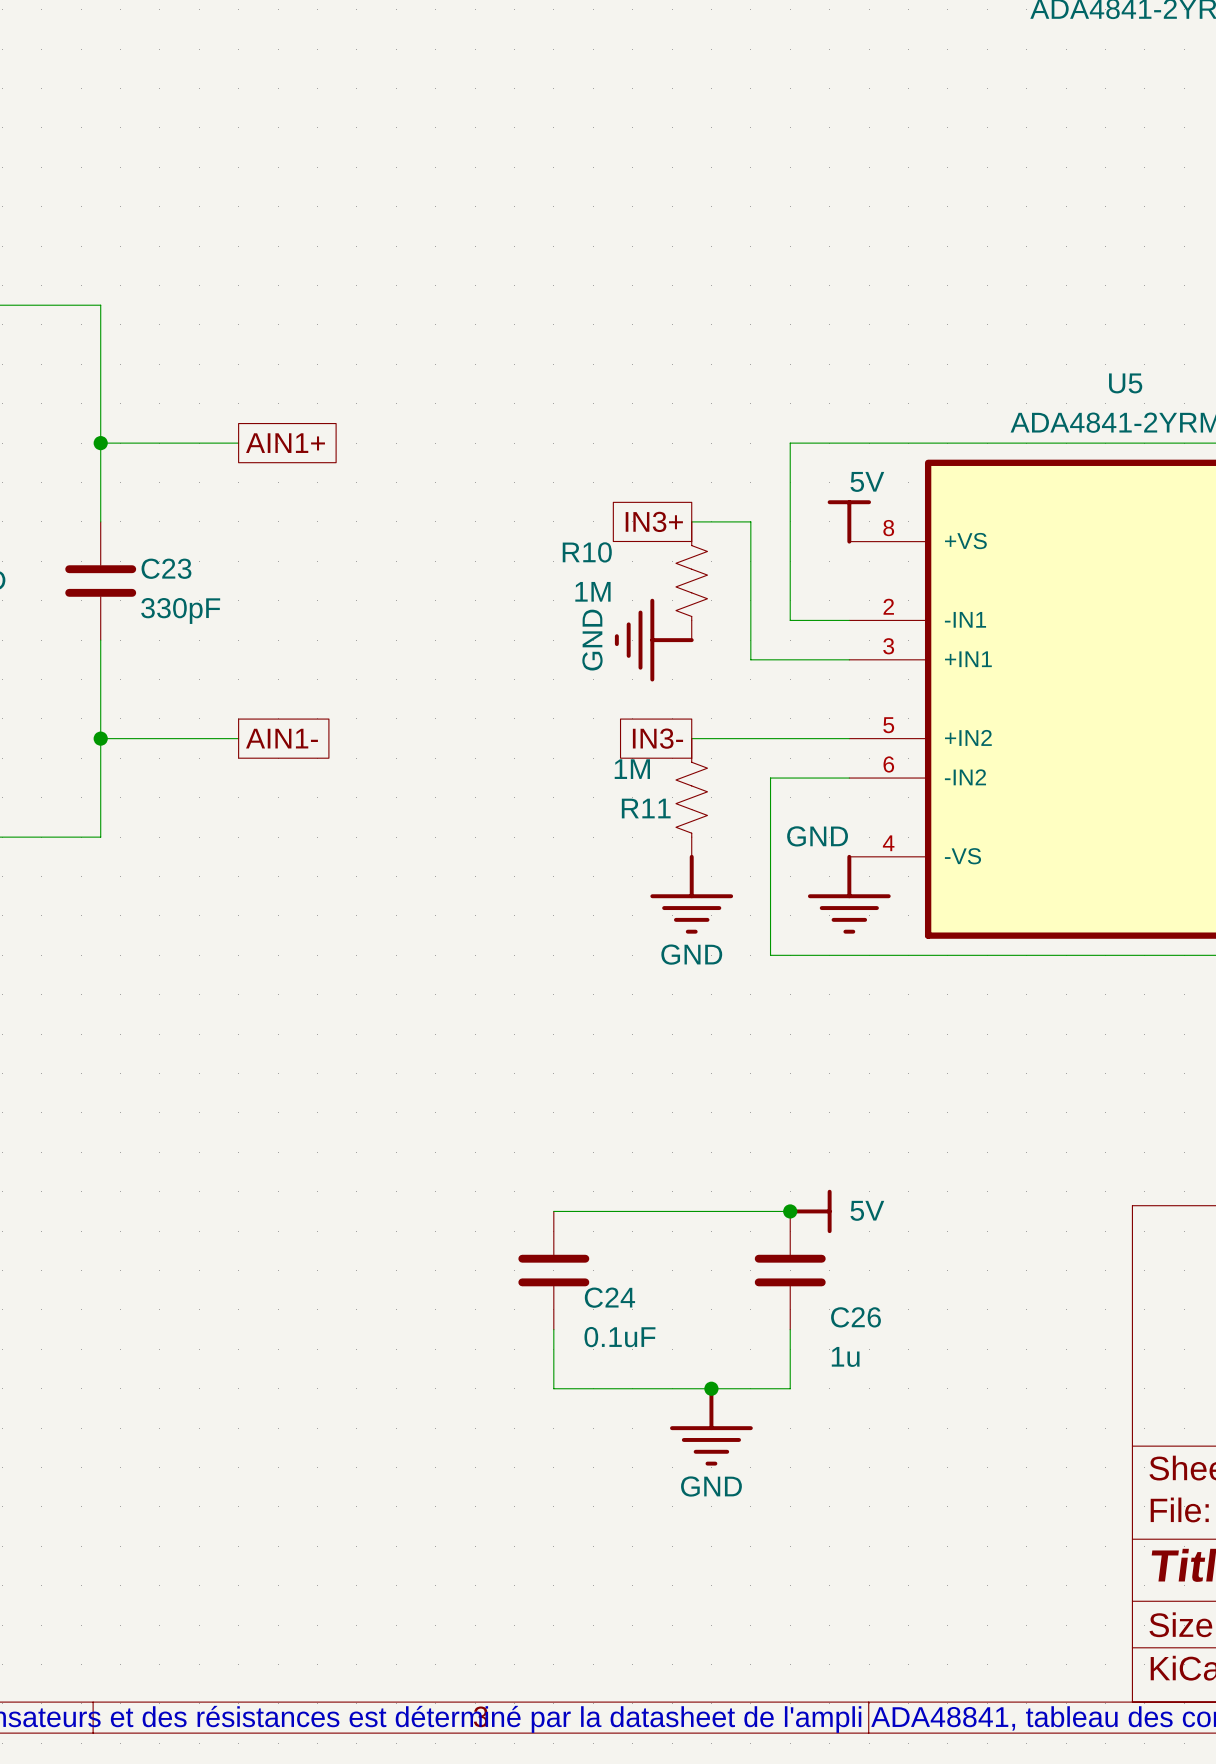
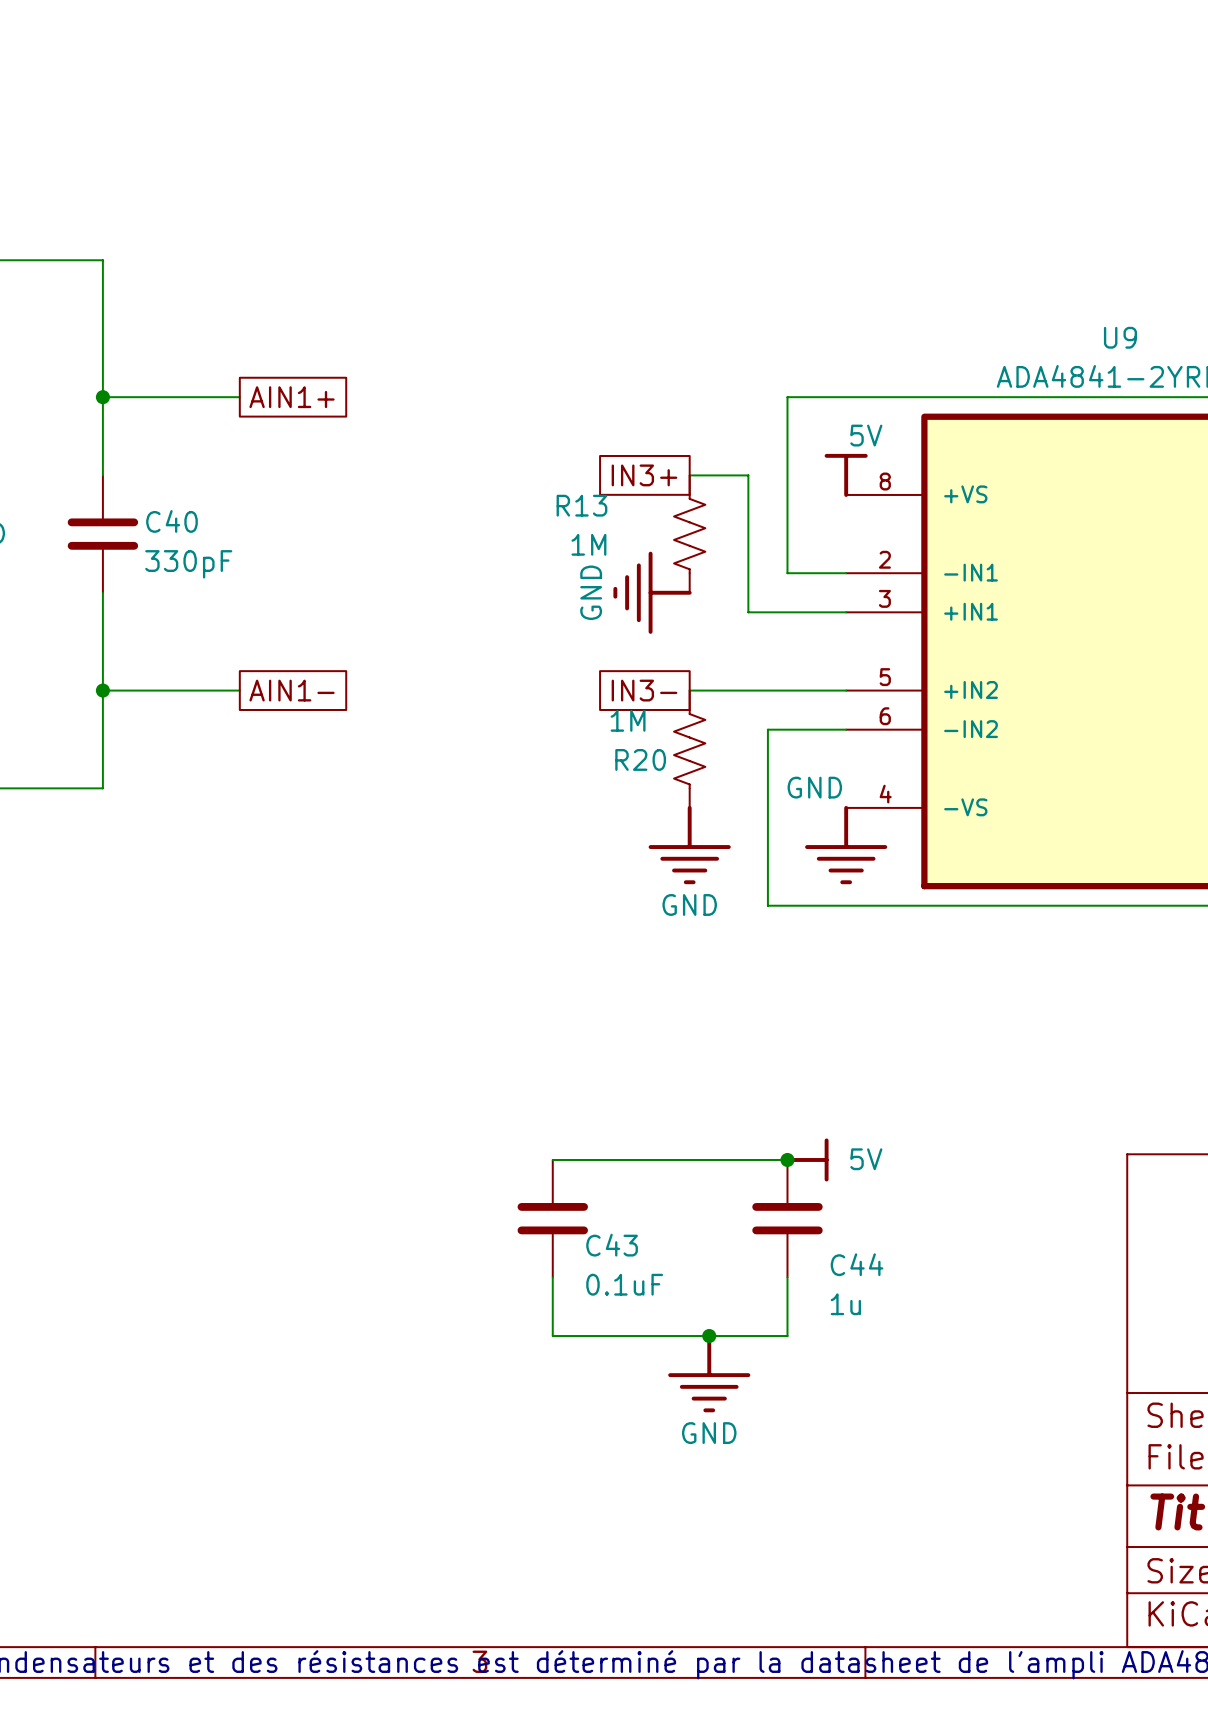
U5 name: U5 (1125, 383) -> U9 (1120, 337)
R10 name: R10 (587, 552) -> R13 (581, 505)
C23 name: C23 (166, 568) -> C40 (171, 521)
R11 name: R11 (646, 808) -> R20 (640, 759)
C24 name: C24 (609, 1297) -> C43 (612, 1245)
C26 name: C26 (855, 1317) -> C44 (857, 1264)

